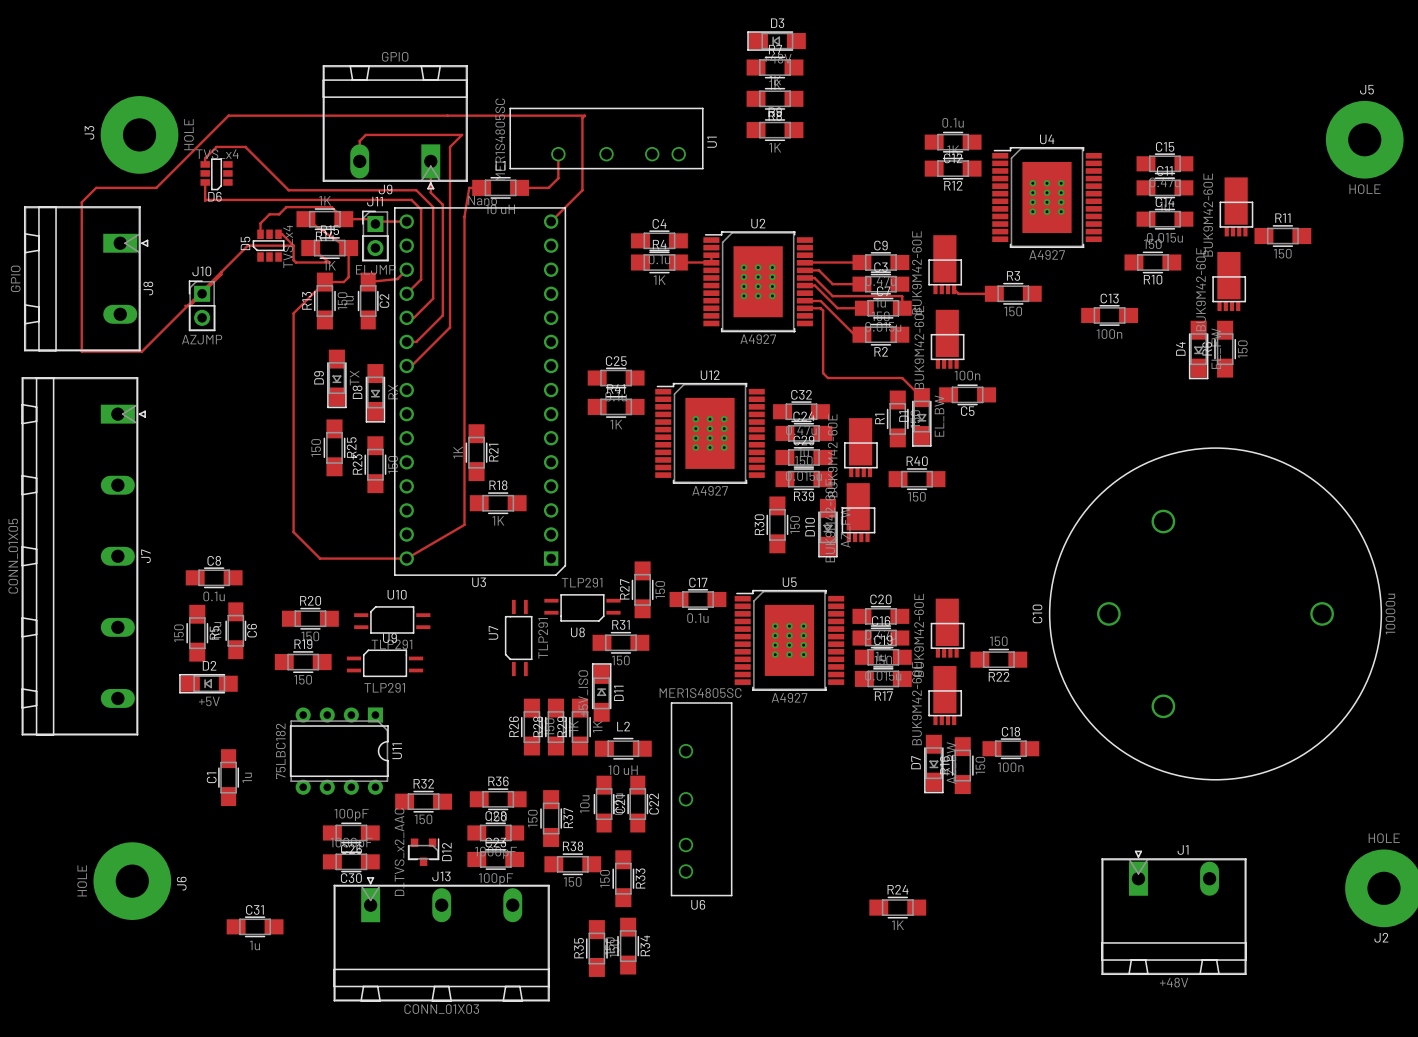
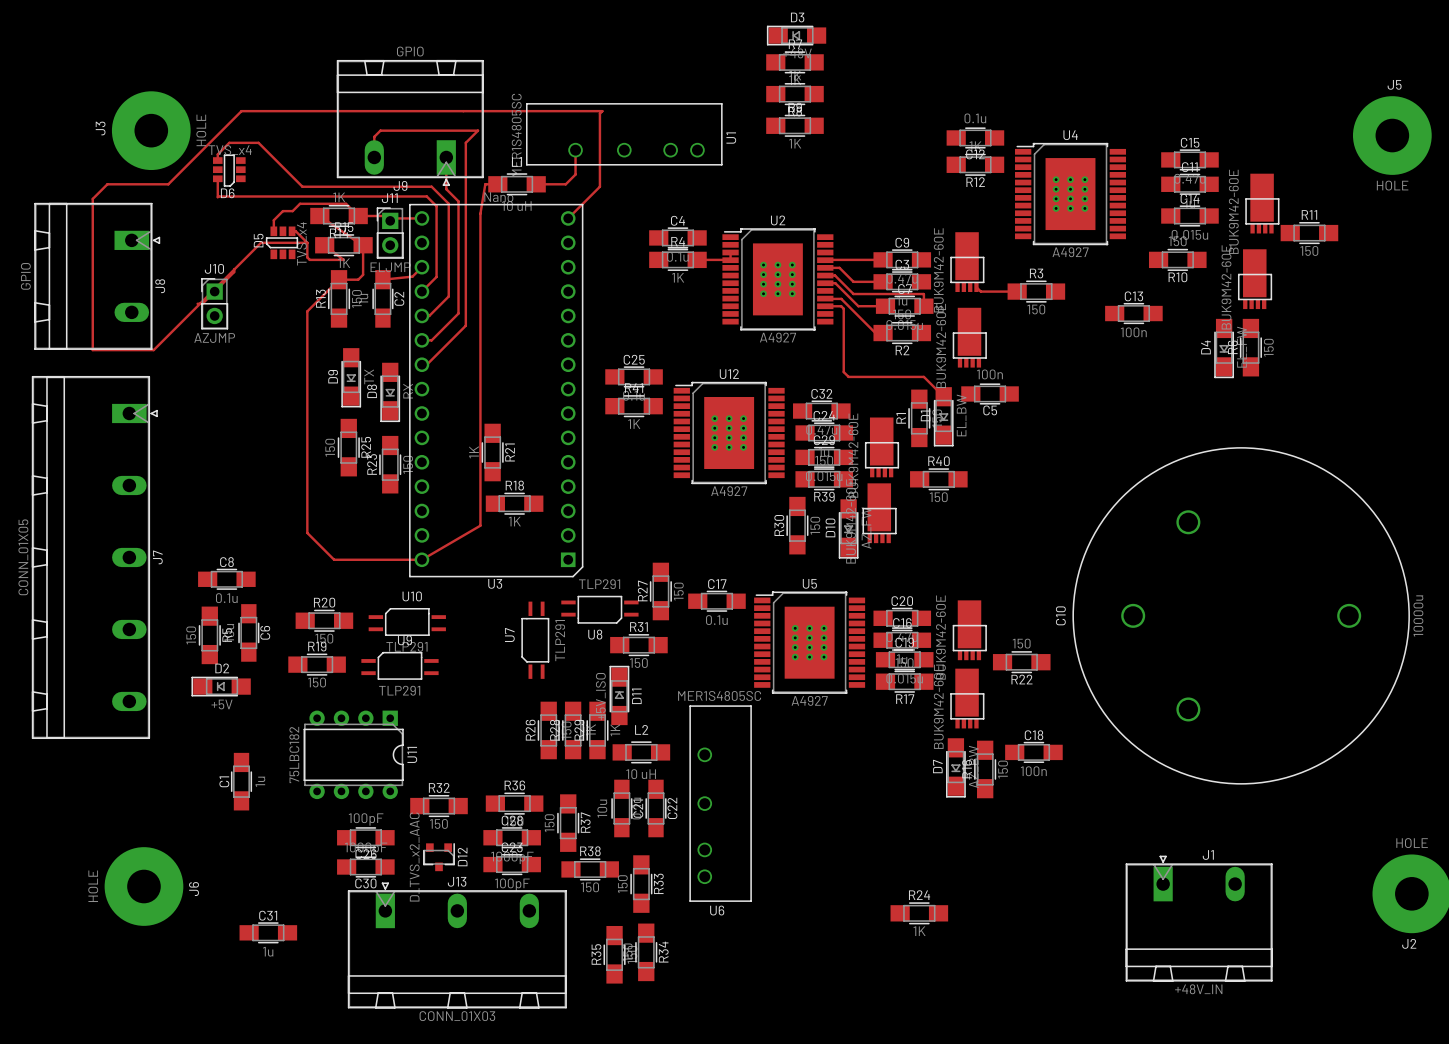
J1 value: +48V (1174, 982) -> +48V_IN (1198, 989)

